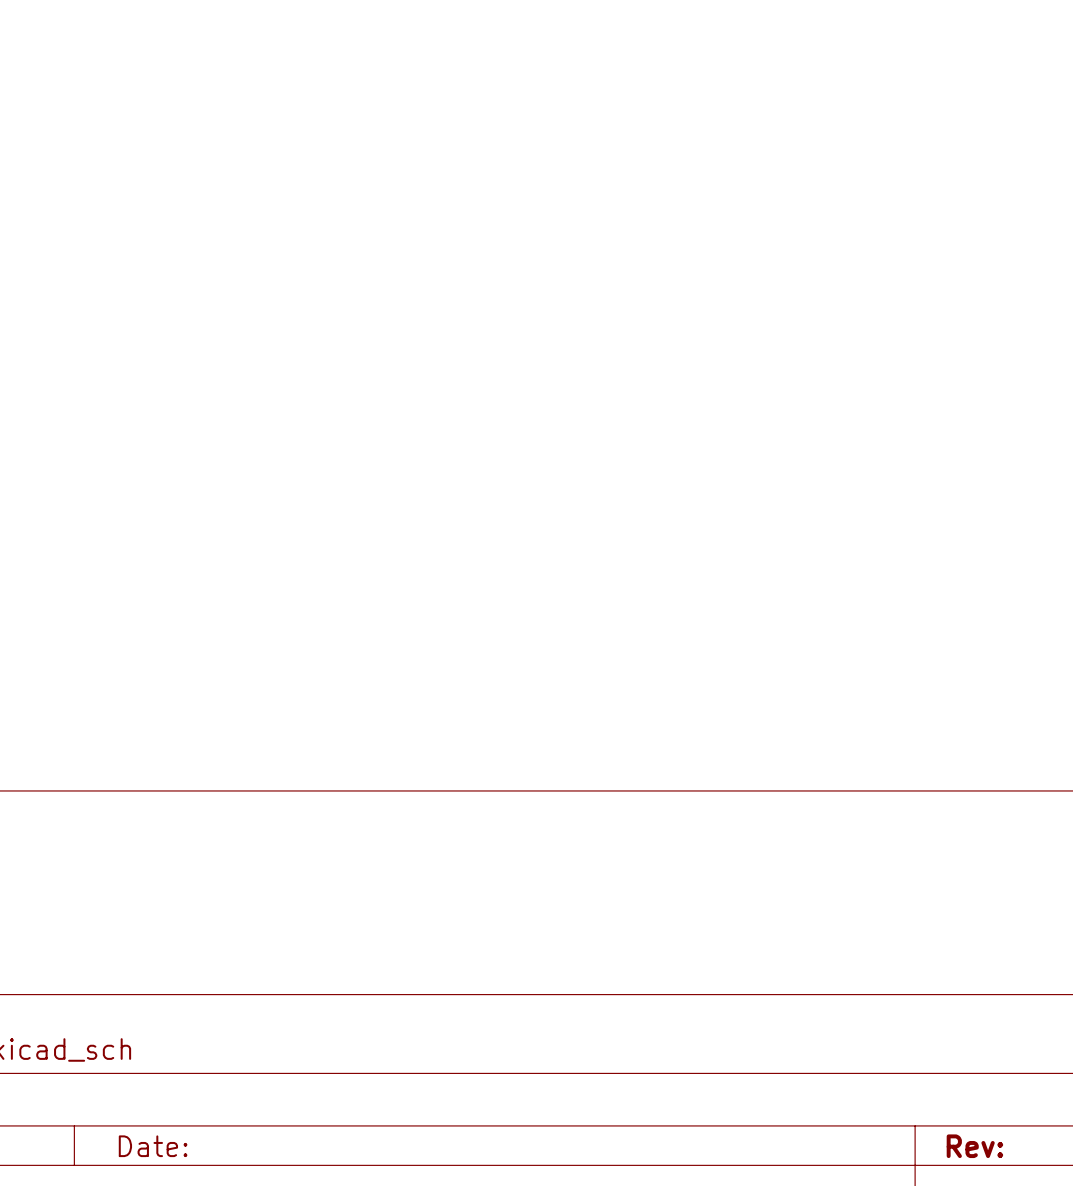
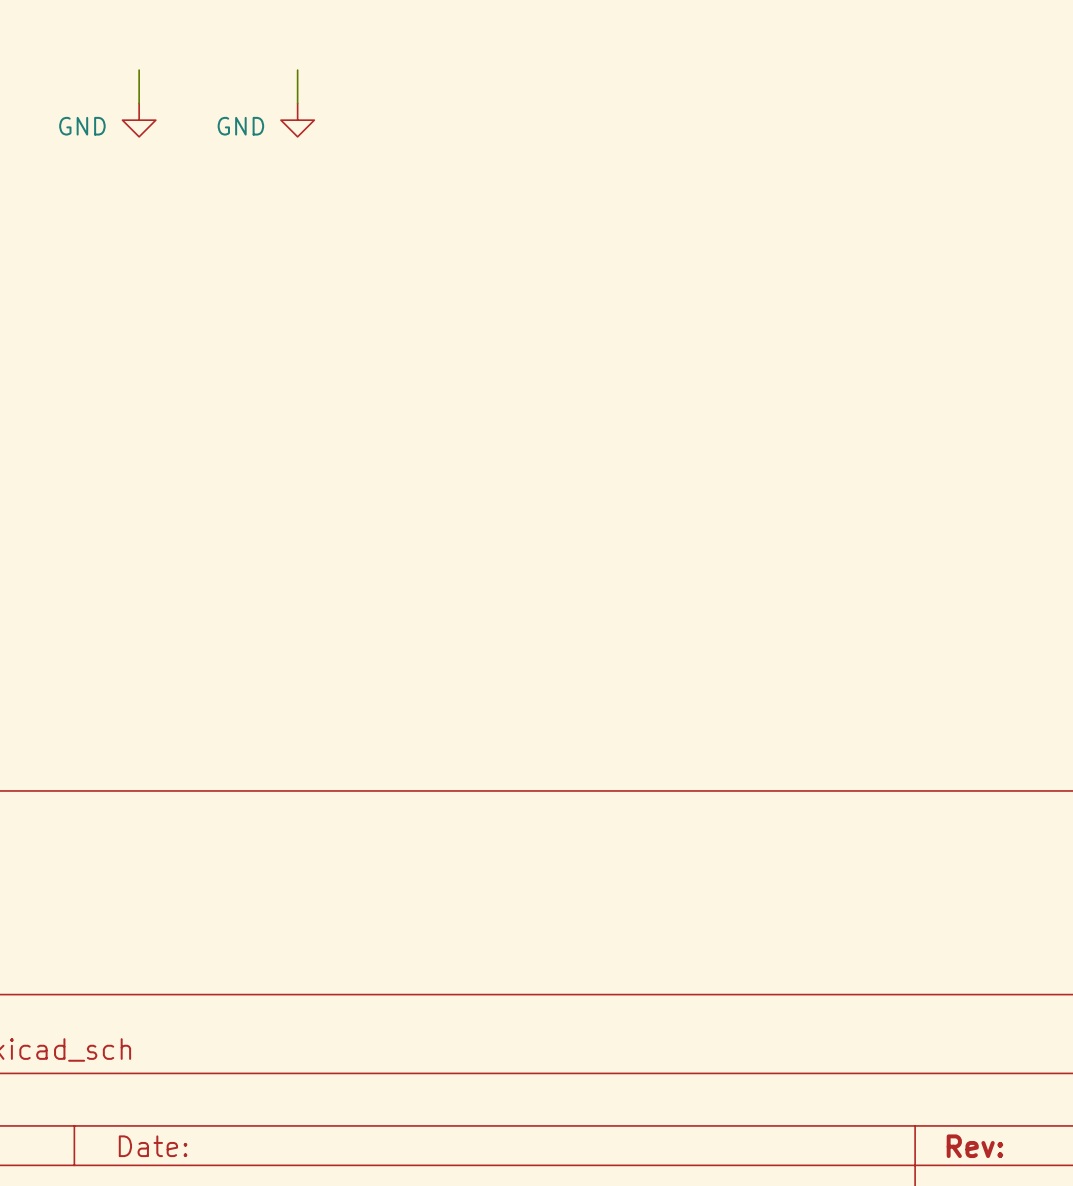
wire: none -> (139, 70) (139, 103)
wire: none -> (297, 70) (297, 103)
power symbol: none -> GND (139, 120)
power symbol: none -> GND (297, 120)

